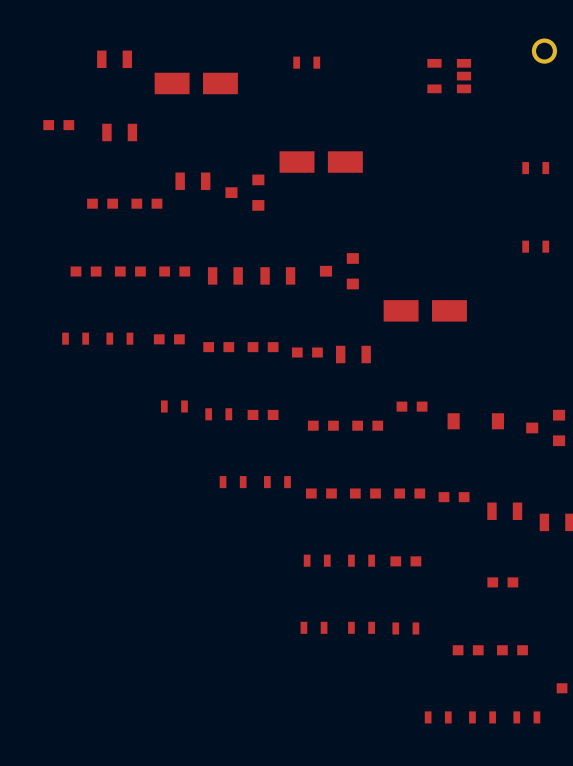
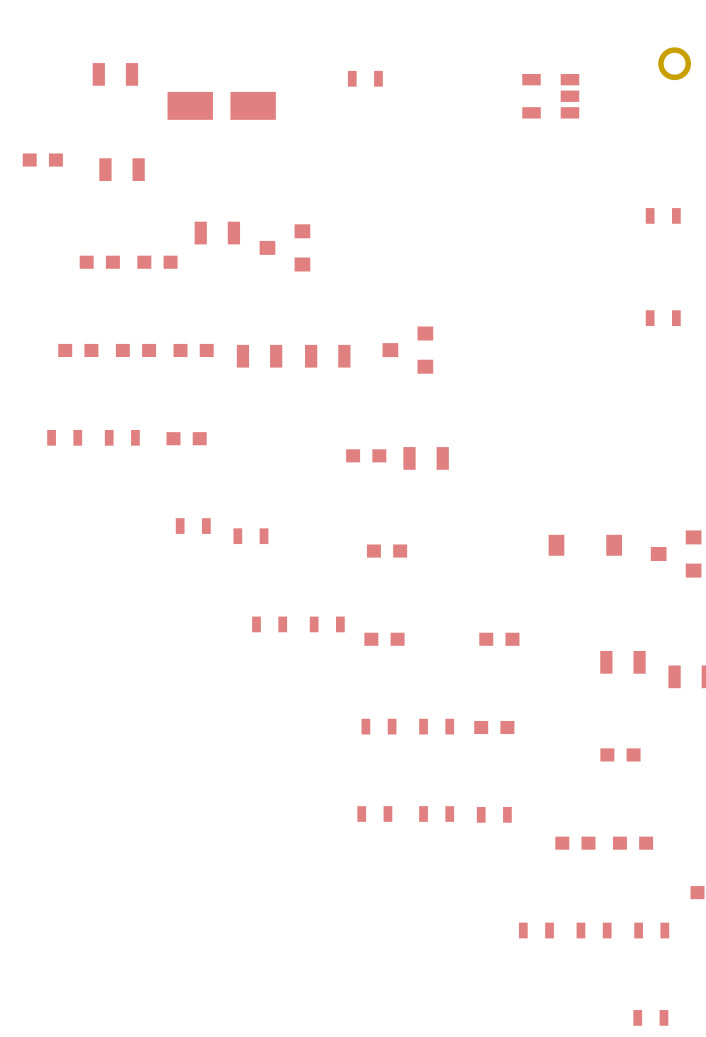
part: (321, 162) -> none
part: (425, 310) -> none
part: (218, 347) -> none
part: (263, 347) -> none
part: (412, 406) -> none
part: (263, 414) -> none
part: (367, 425) -> none
part: (365, 493) -> none
part: (454, 497) -> none

